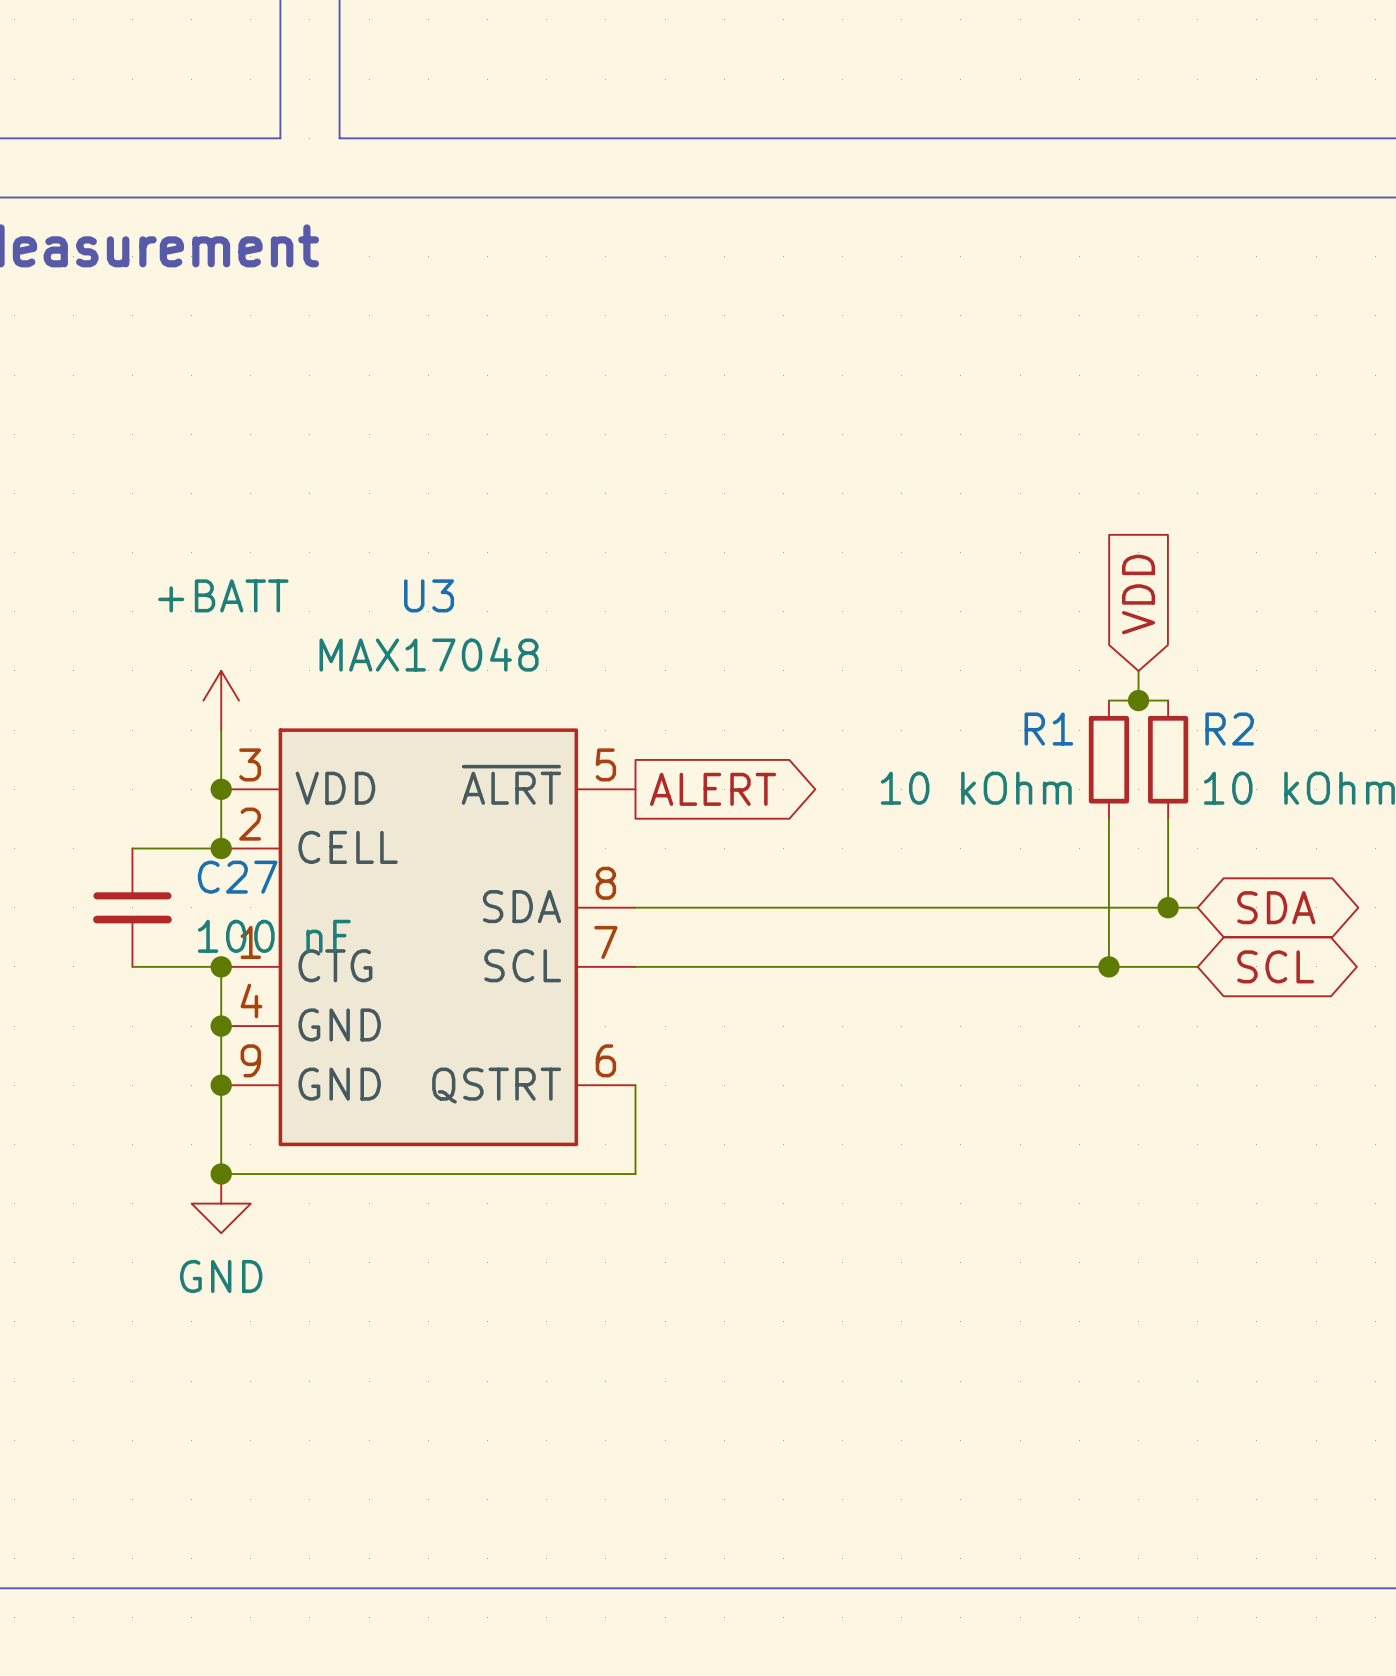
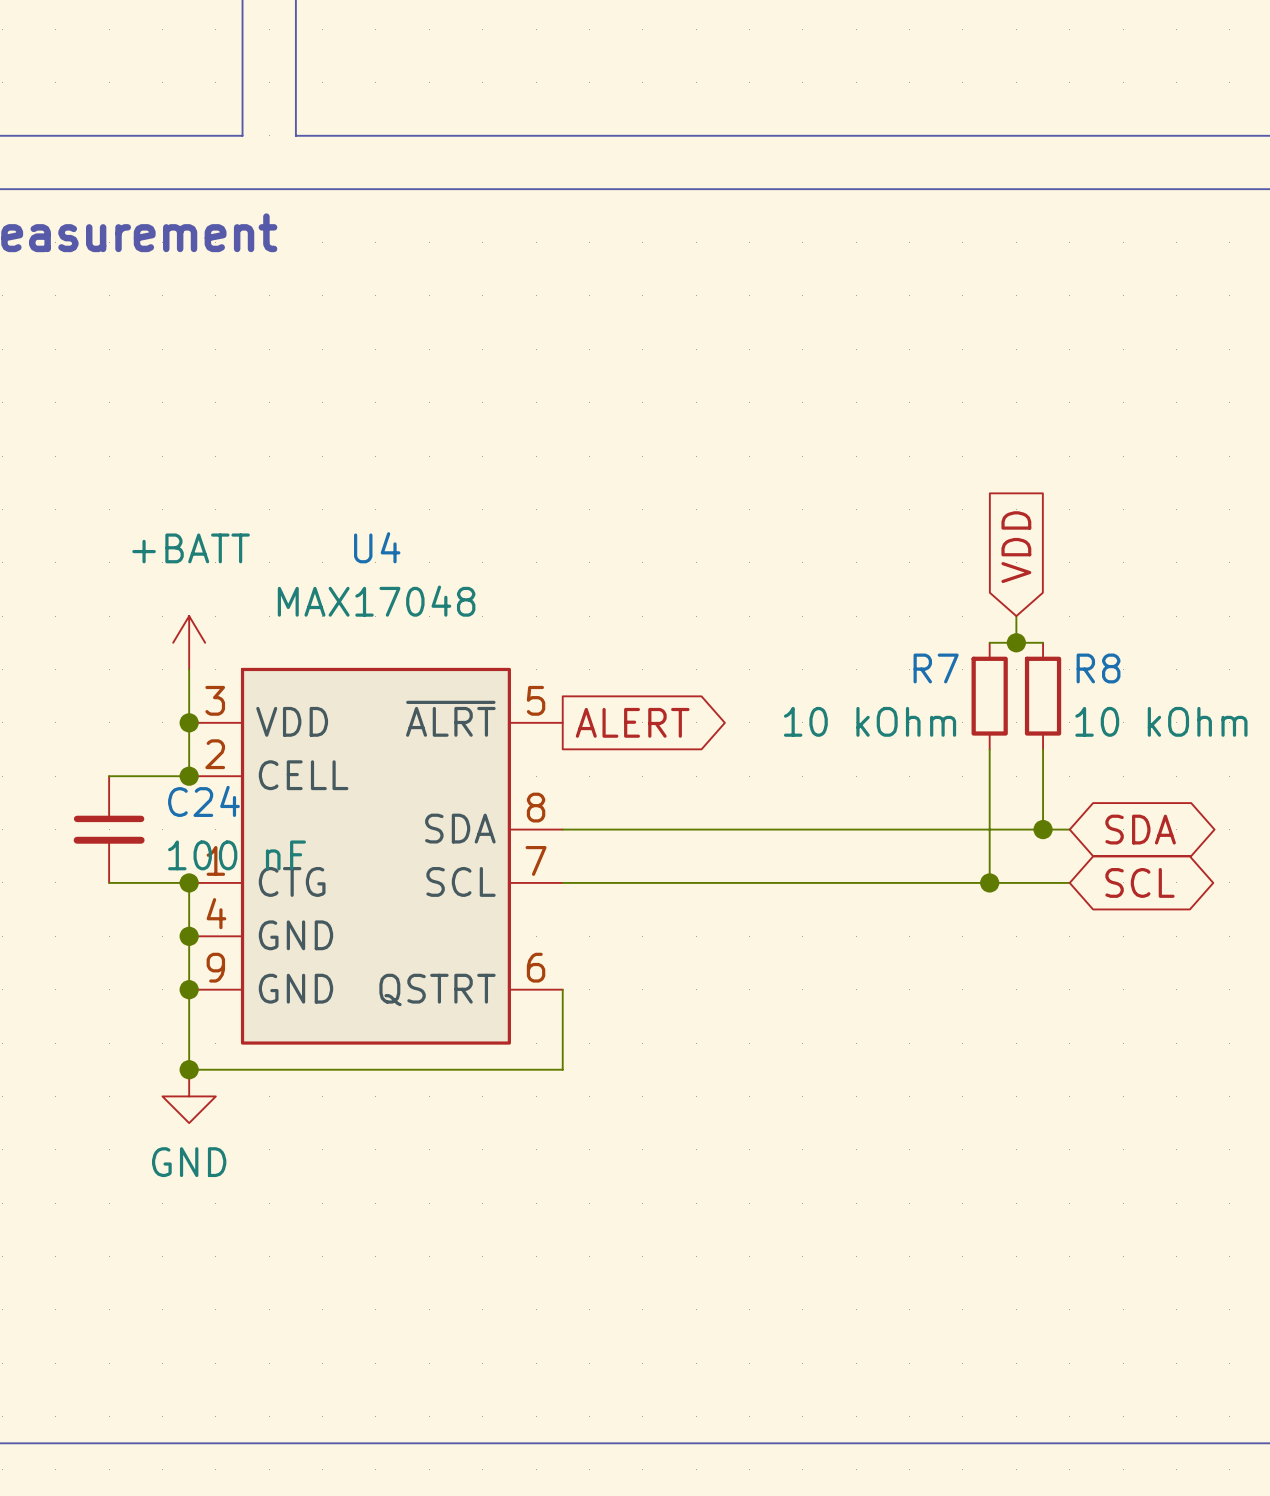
U3 name: U3 (429, 595) -> U4 (377, 547)
R1 name: R1 (1048, 729) -> R7 (936, 668)
R2 name: R2 (1229, 729) -> R8 (1098, 668)
C27 name: C27 (237, 877) -> C24 (203, 801)

